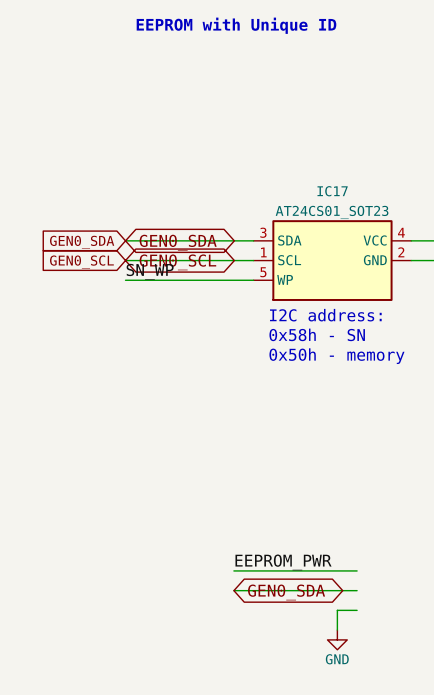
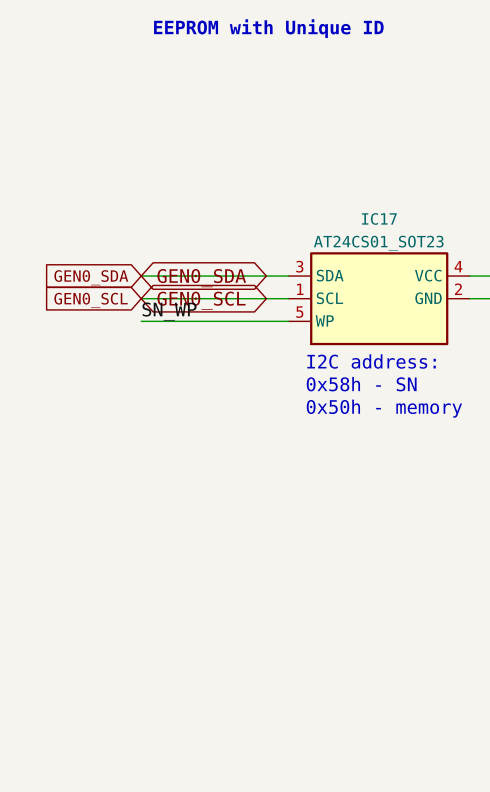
label: EEPROM_PWR (283, 562) -> none
wire: (233, 570) (357, 570) -> none
wire: (233, 590) (357, 590) -> none
global label: GEN0_SDA (286, 592) -> none
wire: (357, 610) (337, 610) (337, 630) -> none
power symbol: GND (337, 639) -> none

